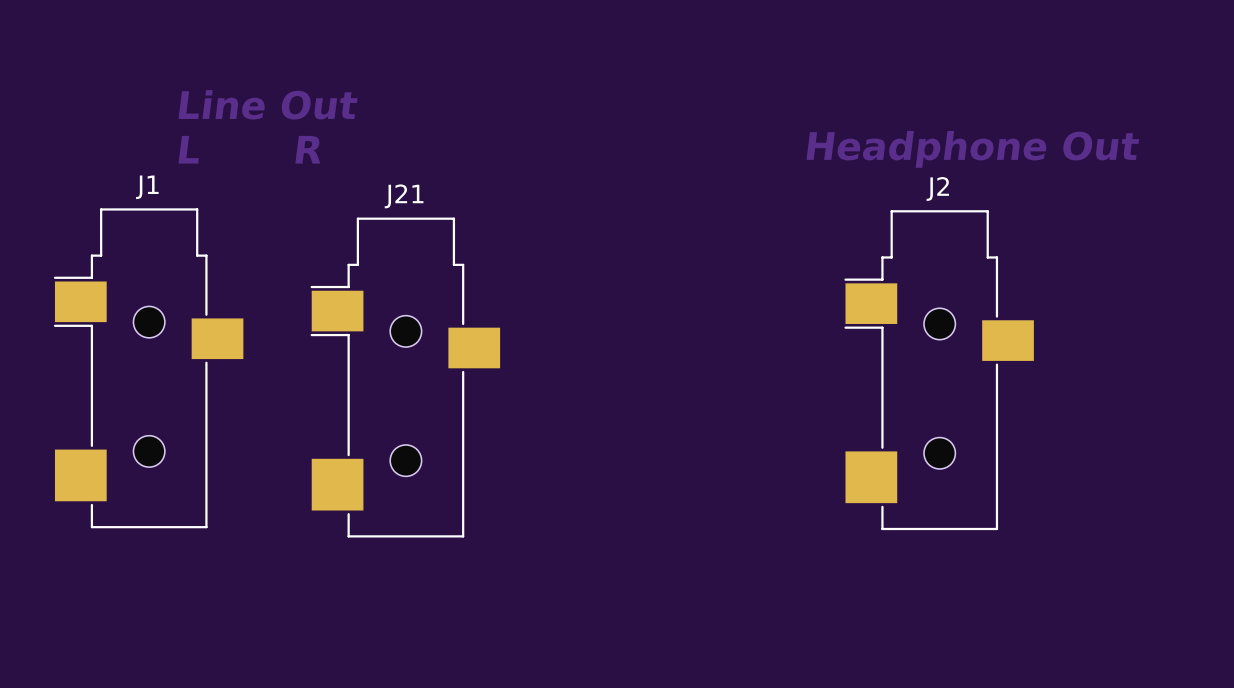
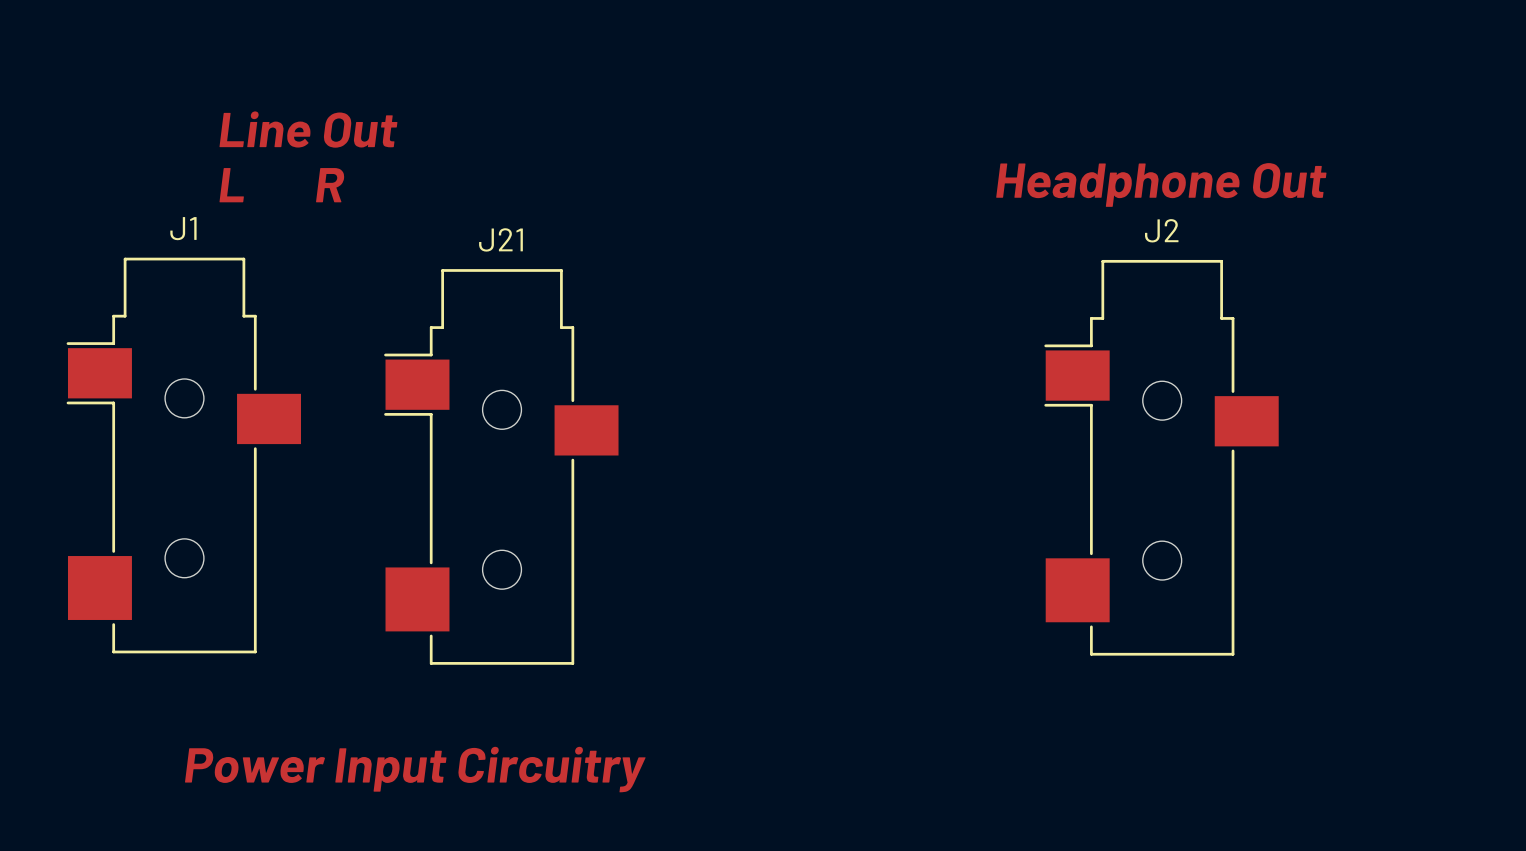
text: none -> Power Input Circuitry (415, 769)

